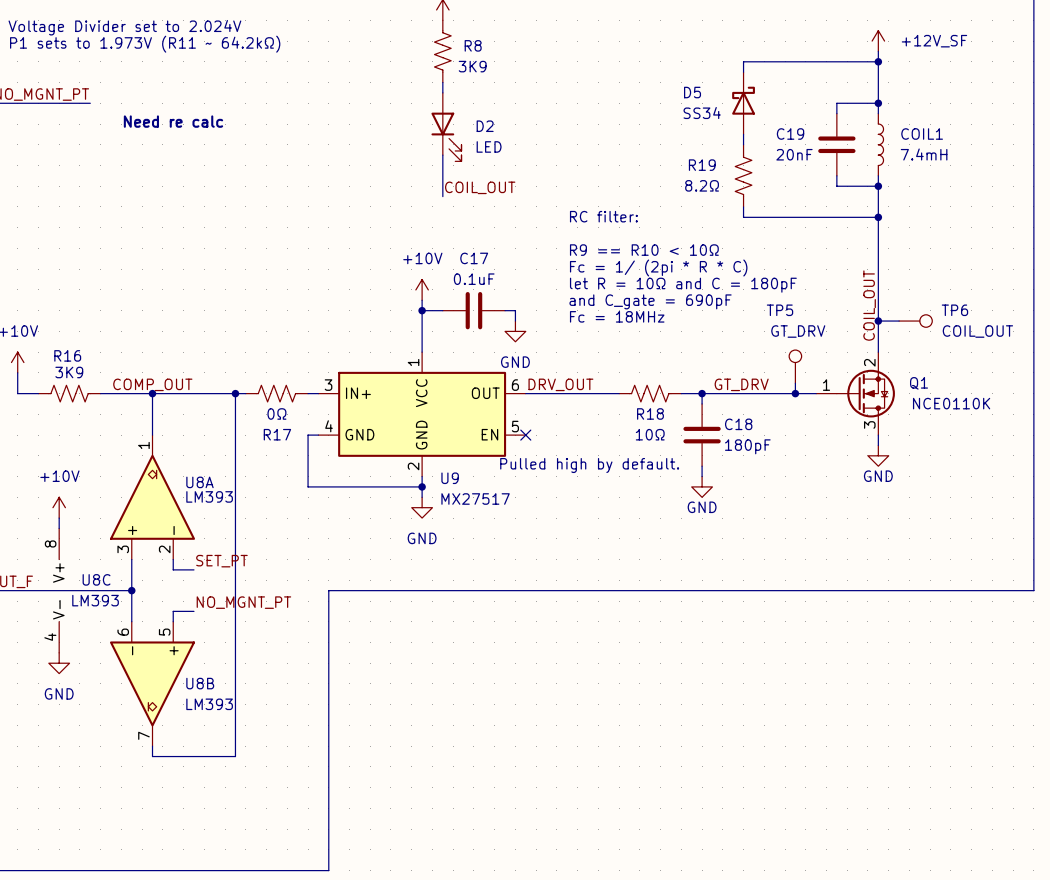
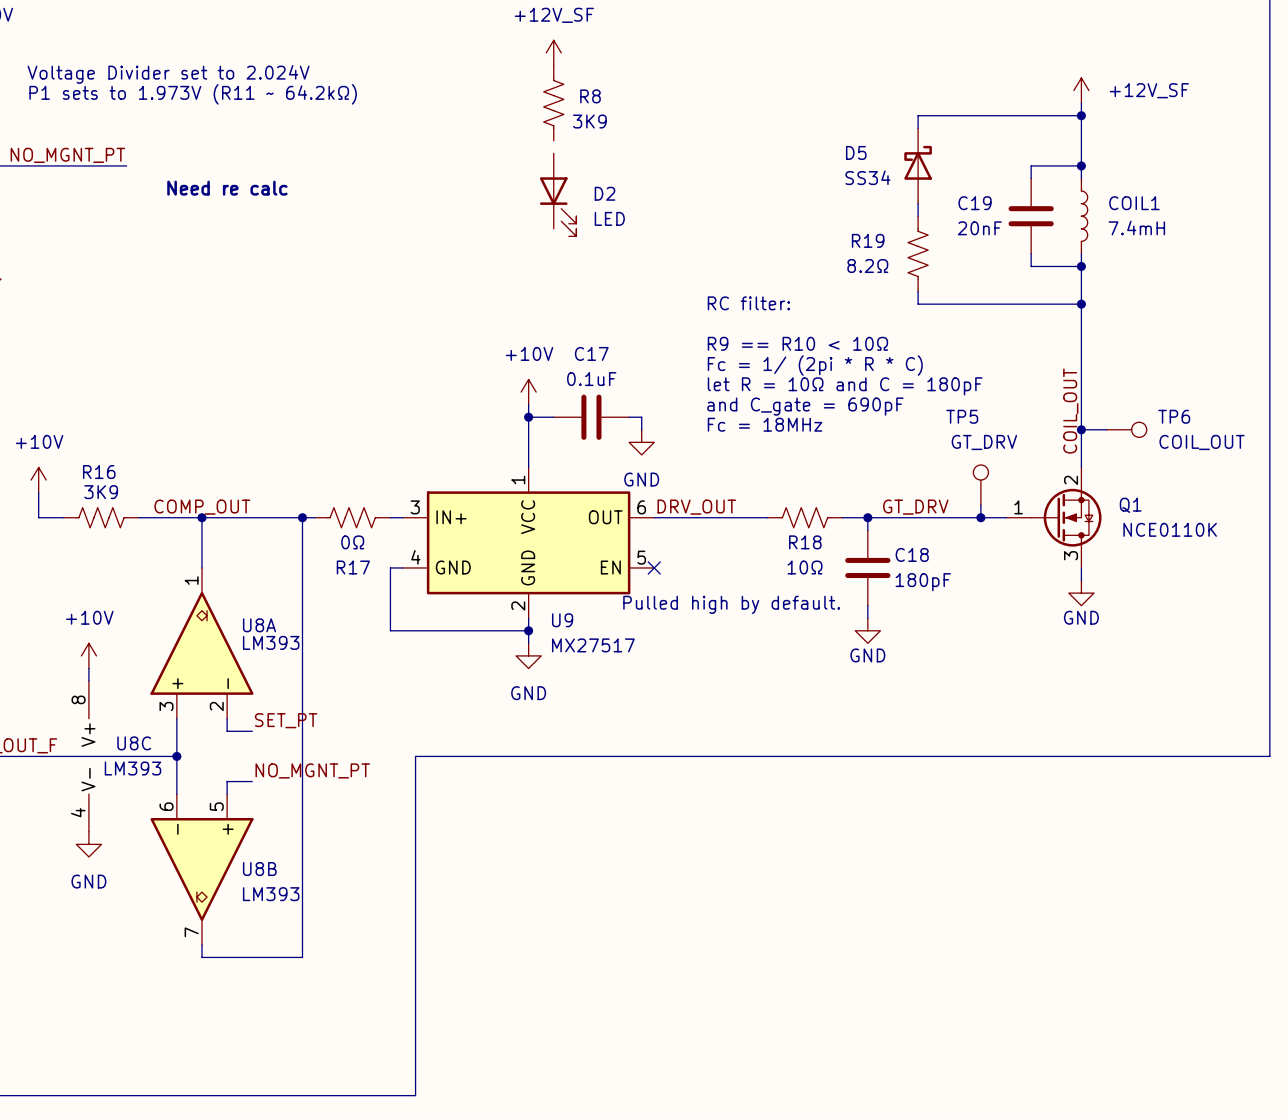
wire: (442, 82) (442, 92) -> none
wire: (442, 155) (442, 196) -> none
label: COIL_OUT (480, 187) -> none

